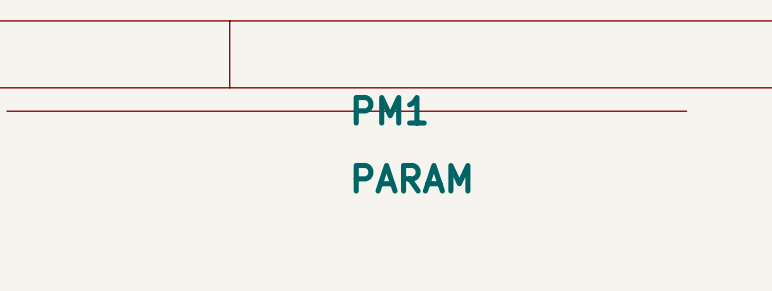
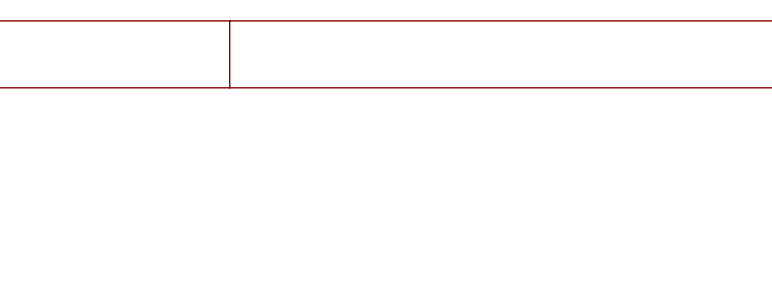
PM1: PARAM (346, 111) -> none

